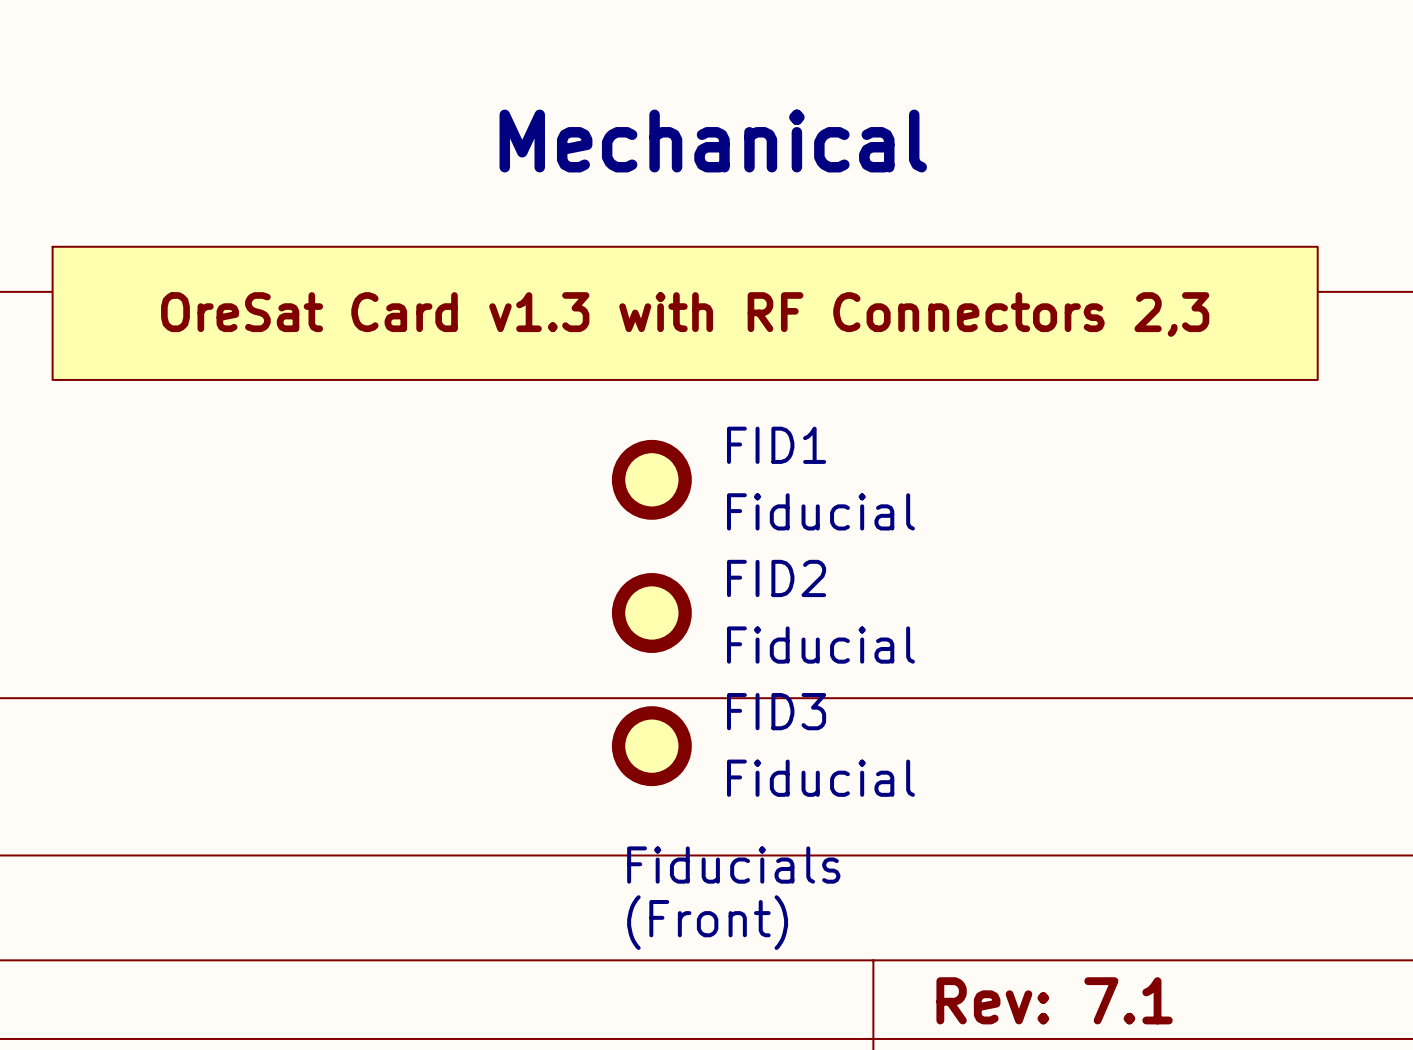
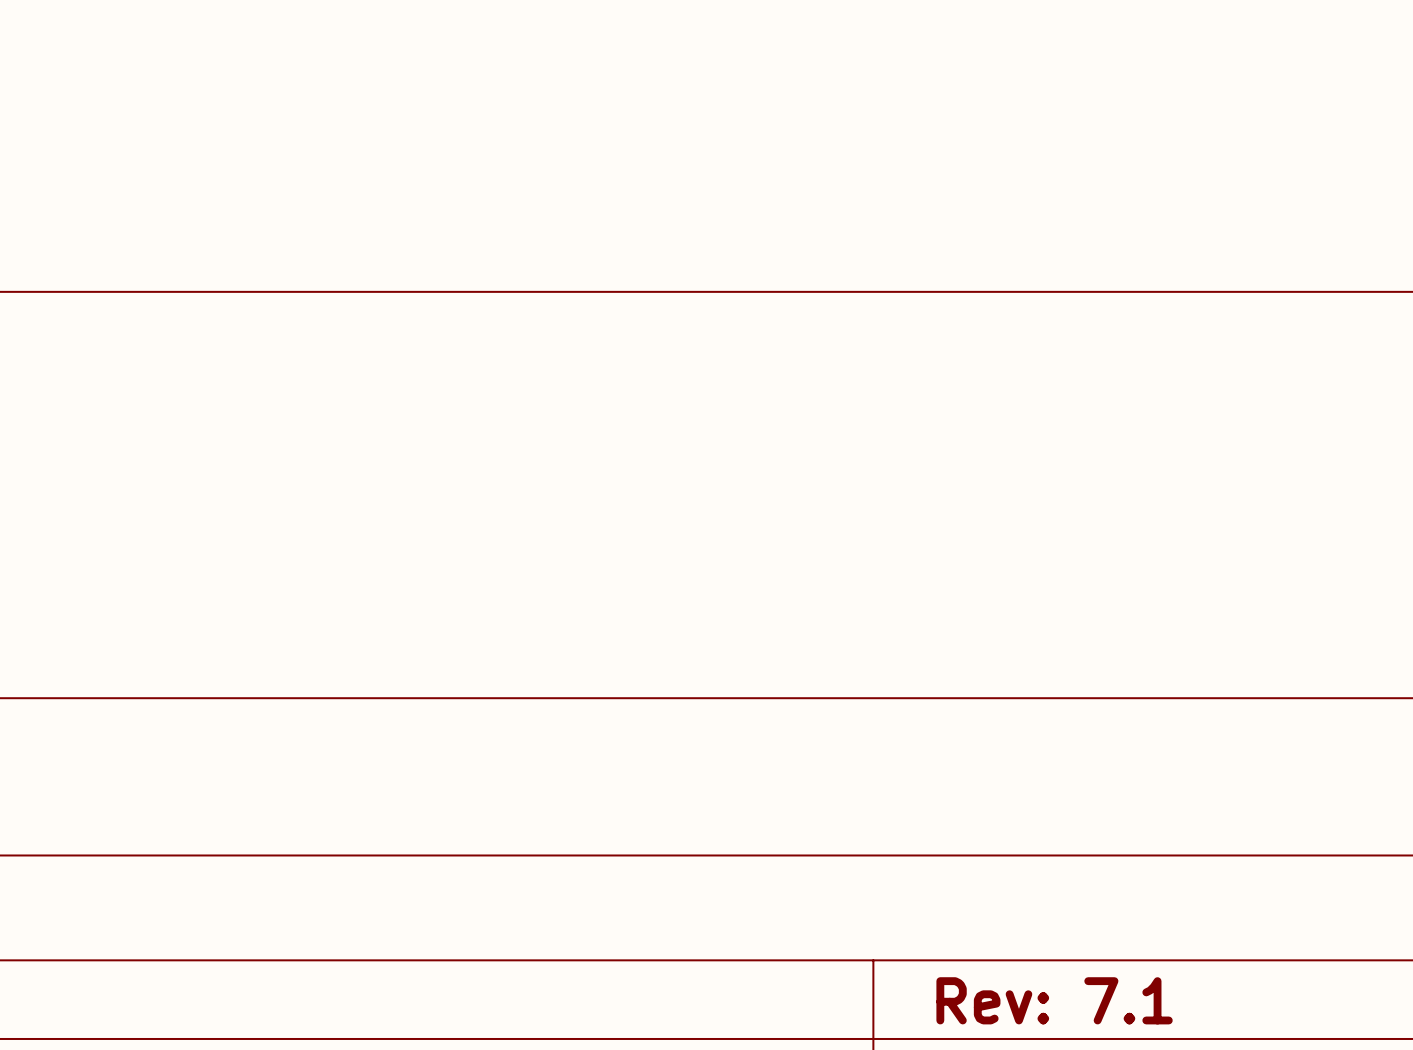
text: Mechanical (713, 141) -> none
part: (685, 313) -> none
FID1: Fiducial (651, 479) -> none
FID2: Fiducial (651, 613) -> none
FID3: Fiducial (651, 746) -> none
text: Fiducials (733, 865) -> none
text: (Front) (707, 922) -> none

